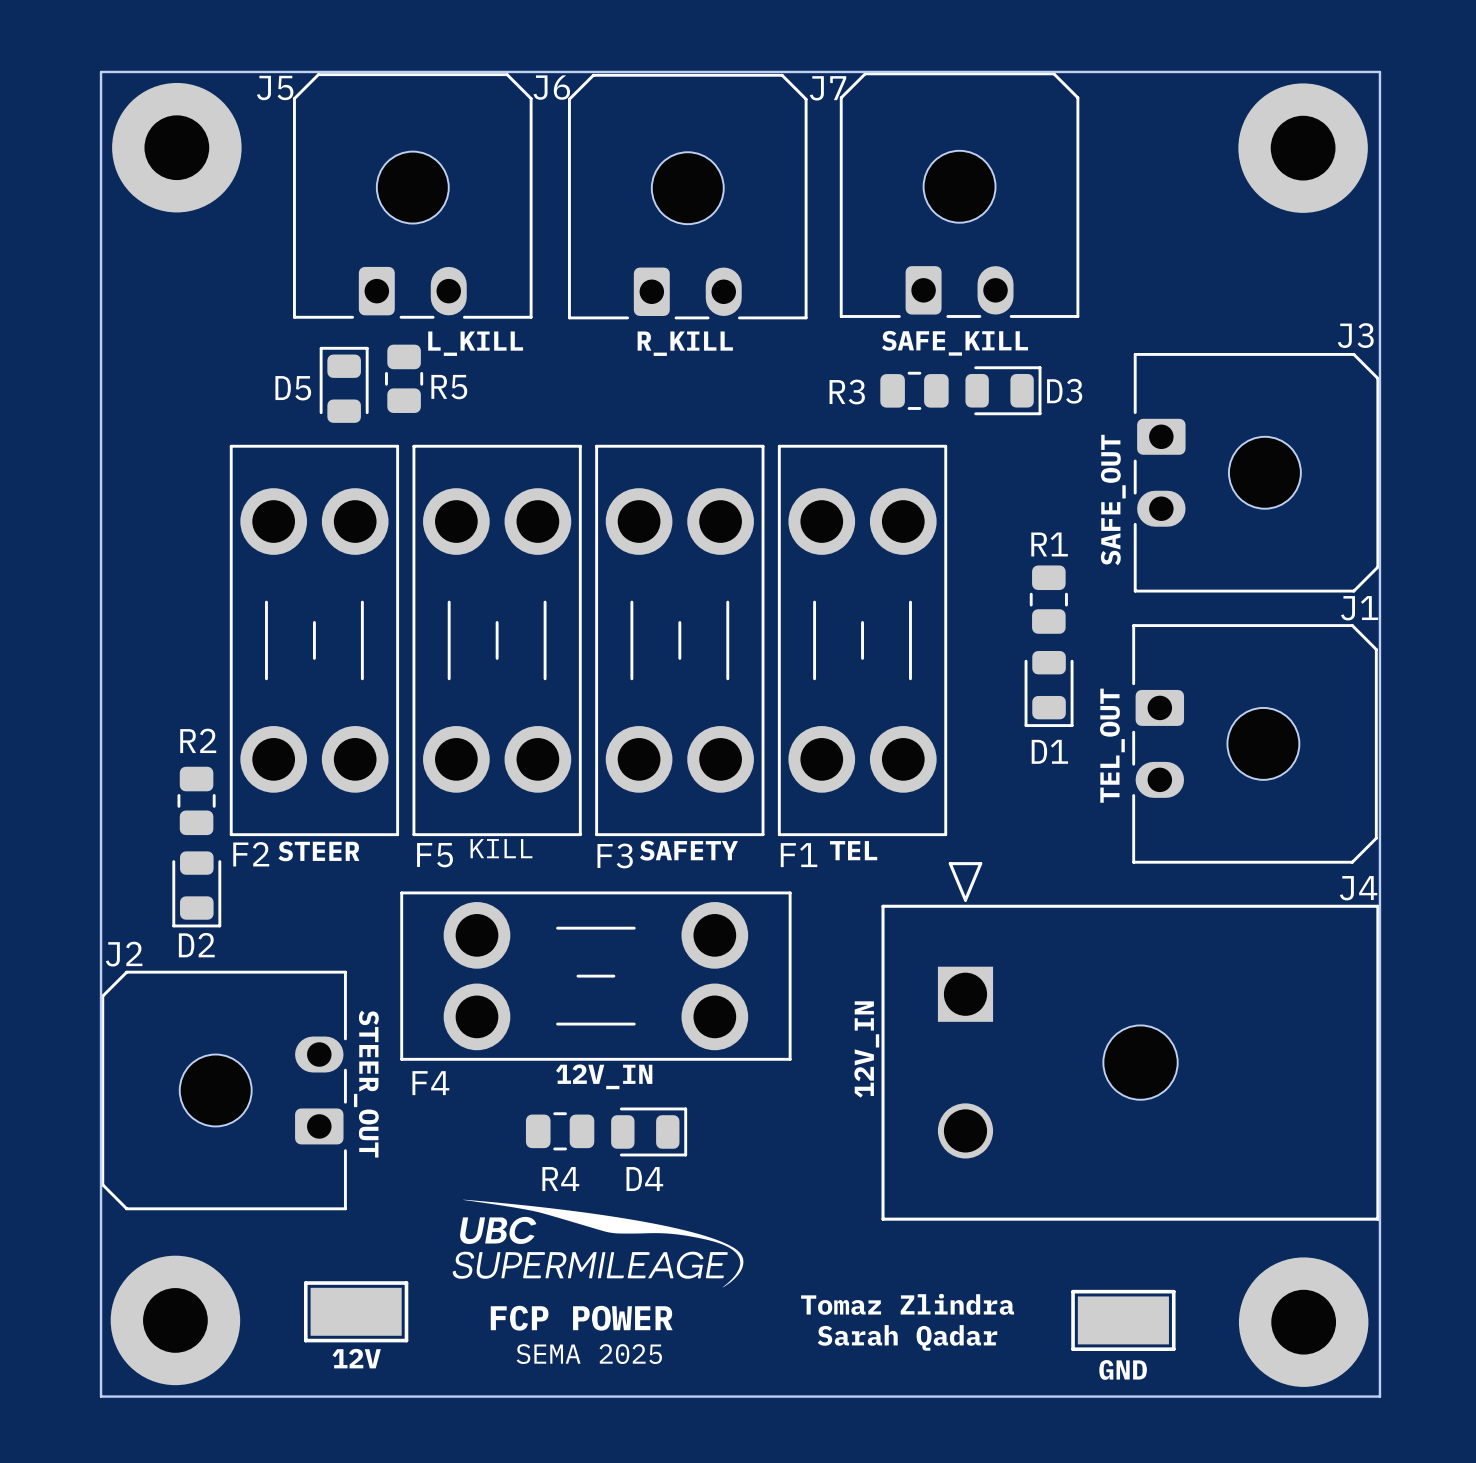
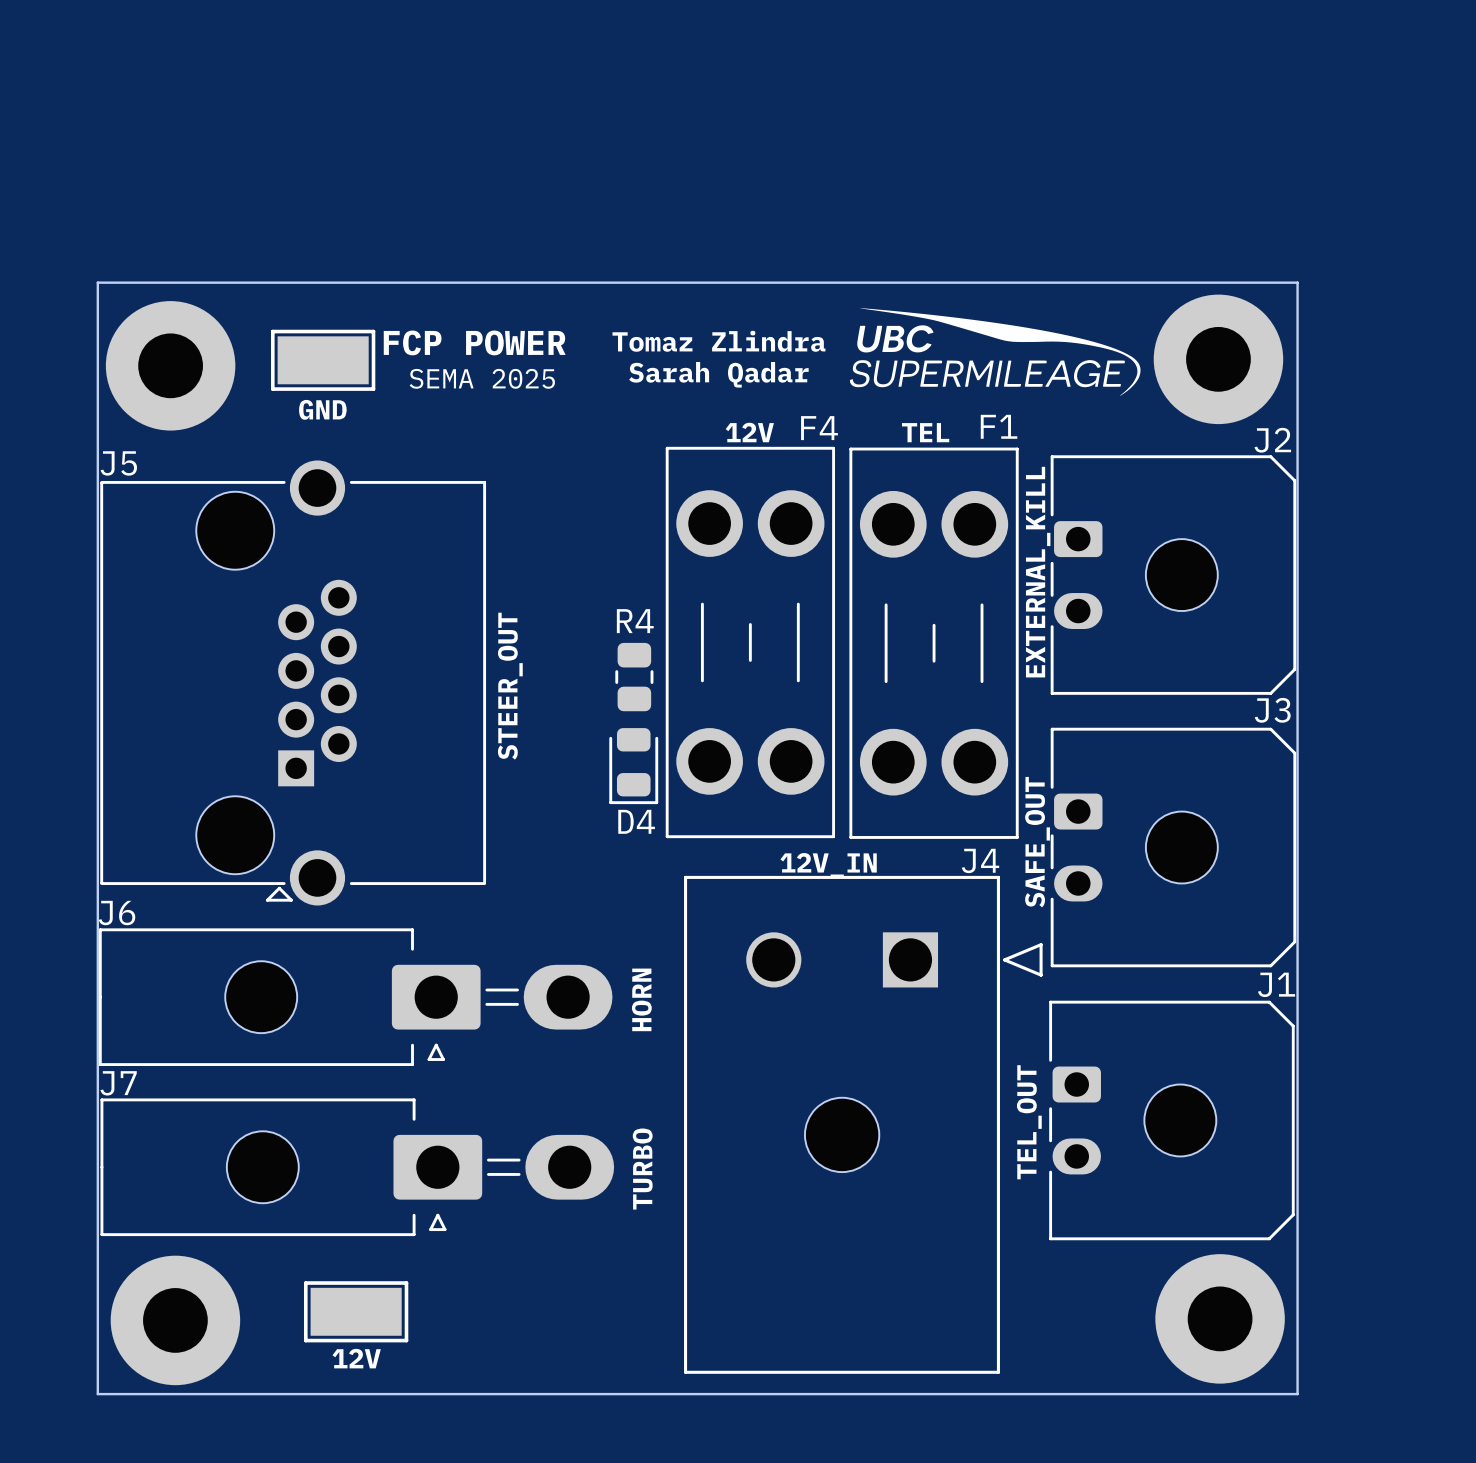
board edge: (101, 71) (1379, 71) (1379, 1396) (101, 1396) (101, 71) -> (97, 282) (97, 1394) (1297, 1394) (1297, 282) (97, 282)
J7 footprint: [839, 72, 1080, 318] -> [100, 1098, 615, 1237]
J6 footprint: [568, 73, 808, 320] -> [98, 928, 613, 1067]
J6 name position: J6 (551, 87) -> J6 (117, 913)
J7 name position: J7 (828, 88) -> J7 (118, 1083)
part position: (176, 147) -> (170, 365)
part position: (1303, 148) -> (1218, 359)
J5: L_KILL (412, 195) -> none
drawing: none -> [849, 308, 1141, 396]
text: none -> Tomaz Zlindra (718, 341)
text: none -> FCP POWER (474, 342)
J6 value: R_KILL (685, 343) -> none
J7 value: SAFE_KILL (955, 343) -> none
part: none -> GND (323, 360)
text: none -> Sarah Qadar (718, 374)
R5: (404, 378) -> none
text: none -> SEMA 2025 (482, 378)
D5: (344, 384) -> none
R3: (914, 390) -> none
D3: (1003, 390) -> none
text: none -> 12V (749, 432)
text: none -> J5 (118, 463)
J3 position: (1256, 472) -> (1173, 847)
J3 value: SAFE_OUT (1113, 500) -> none
text: none -> EXTERNAL_KILL (1038, 572)
R1: (1048, 599) -> none
F2: (314, 640) -> none
F5: (497, 640) -> none
F3: (679, 640) -> none
F1 position: (862, 640) -> (934, 643)
part: none -> (293, 682)
text: none -> STEER_OUT (510, 686)
D1: (1049, 689) -> none
J1 position: (1255, 743) -> (1171, 1120)
R2: (196, 800) -> none
text: none -> SAFE_OUT (1037, 842)
text: KILL (501, 848) -> none
text: SAFETY (689, 850) -> none
text position: TEL (853, 850) -> TEL (925, 432)
text: STEER (318, 851) -> none
F1 name position: F1 (799, 855) -> F1 (999, 426)
J4 name position: J4 (1358, 888) -> J4 (980, 860)
D2: (196, 889) -> none
J2 name position: J2 (124, 954) -> J2 (1272, 440)
F4 rotation: 0° (595, 976) -> 90° clockwise (750, 642)
F4 position: (595, 976) -> (750, 642)
text: none -> HORN (641, 999)
J4 rotation: 0° (1130, 1041) -> 90° clockwise (863, 1124)
text: 12V_IN (604, 1076) -> none
F4 name position: F4 (430, 1083) -> F4 (819, 428)
J2 value: STEER_OUT (366, 1084) -> none
J2 rotation: 0° (224, 1090) -> 180° (1173, 575)
J2 position: (224, 1090) -> (1173, 575)
R4 rotation: 0° (560, 1131) -> 90° clockwise (634, 677)
R4 position: (560, 1131) -> (634, 677)
D4 rotation: 0° (649, 1131) -> 90° clockwise (633, 766)
D4 position: (649, 1131) -> (633, 766)
text: none -> TURBO (642, 1169)
R4 name position: R4 (560, 1179) -> R4 (635, 621)
drawing: [452, 1199, 744, 1288] -> none
text: Tomaz Zlindra (907, 1304) -> none
text: FCP POWER (581, 1318) -> none
part: GND (1123, 1320) -> none
part position: (1303, 1322) -> (1220, 1318)
text: Sarah Qadar (907, 1337) -> none
text: SEMA 2025 (589, 1354) -> none

